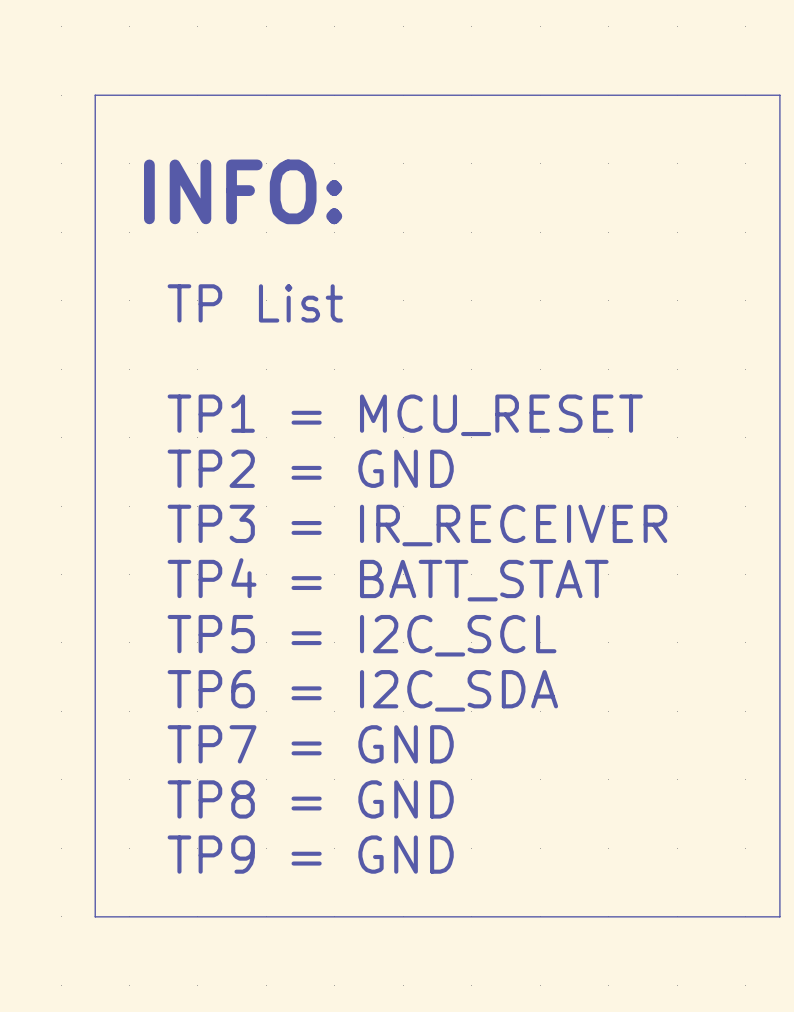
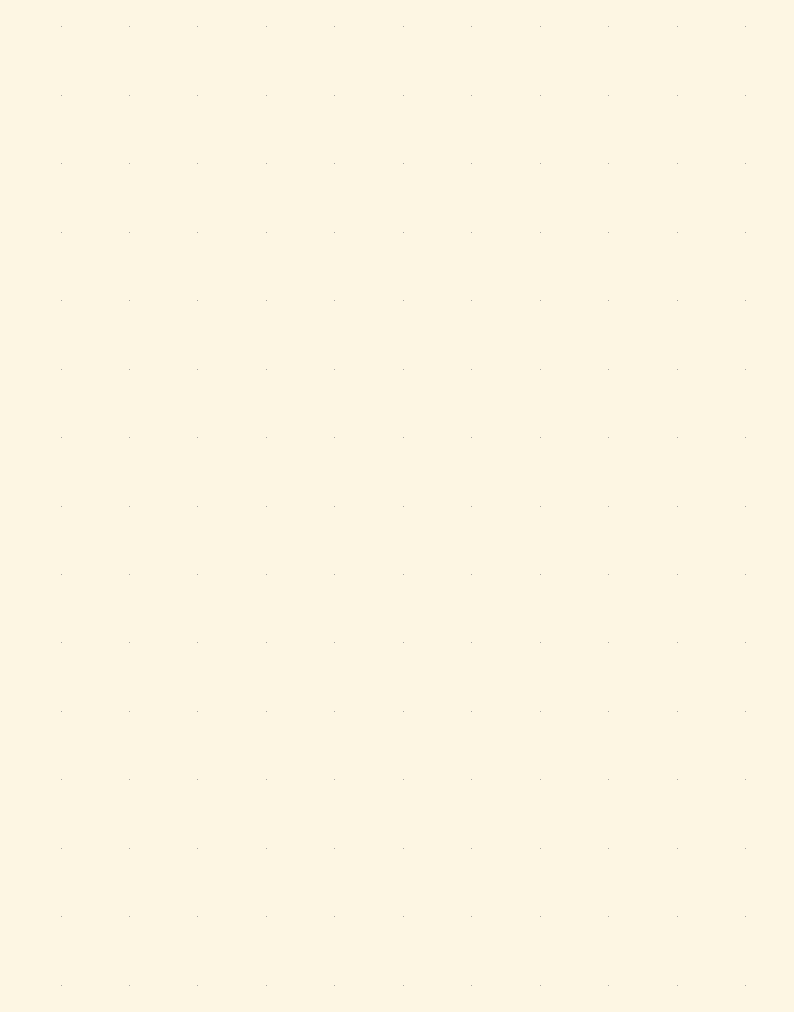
line: (95, 95) (95, 916) (779, 916) (779, 95) (95, 95) -> none
text: INFO: (243, 191) -> none
text: TP List (255, 303) -> none
text: TP1 = MCU_RESET (405, 415) -> none
text: TP2 = GND (310, 468) -> none
text: TP3 = IR_RECEIVER (417, 525) -> none
text: TP4 = BATT_STAT (388, 579) -> none
text: TP5 = I2C_SCL (362, 635) -> none
text: TP6 = I2C_SDA (362, 690) -> none
text: TP7 = GND (310, 744) -> none
text: TP8 = GND (310, 799) -> none
text: TP9 = GND (310, 854) -> none

